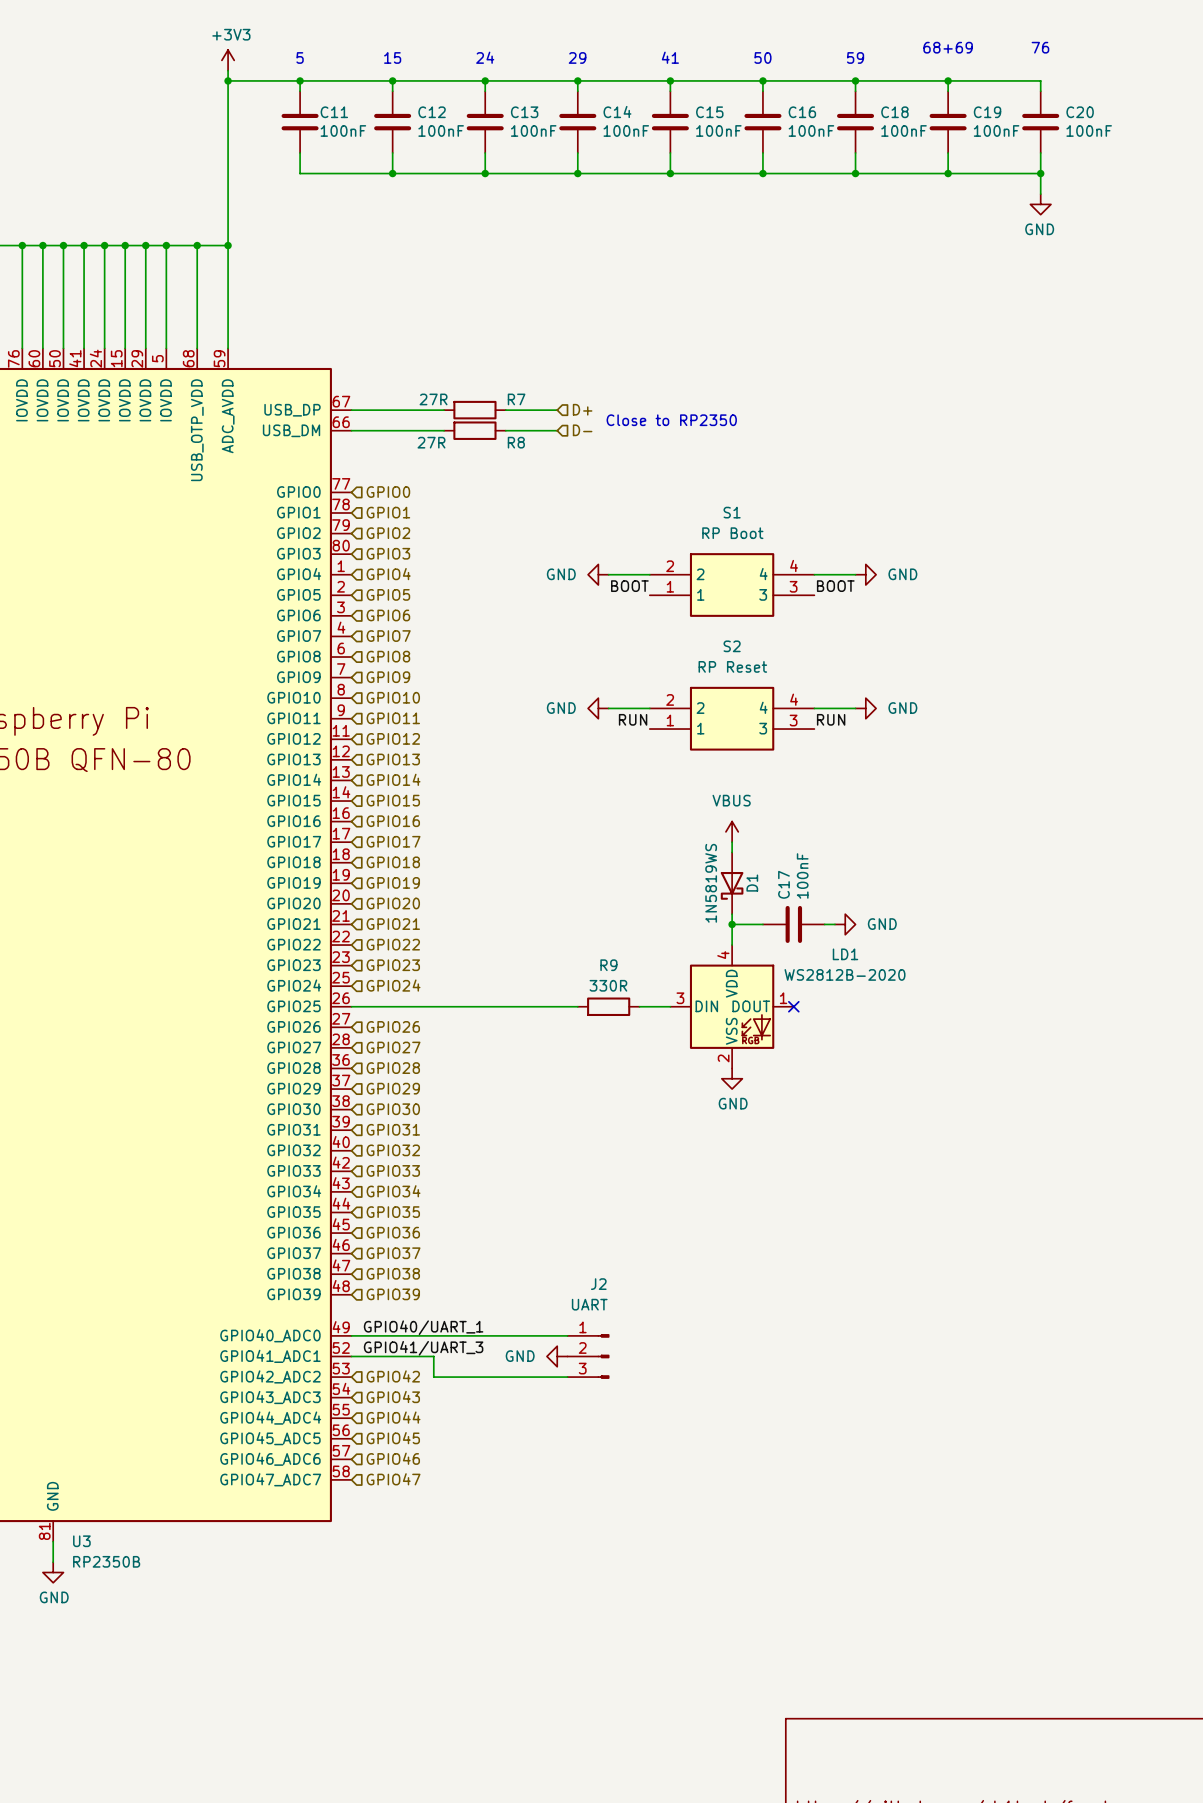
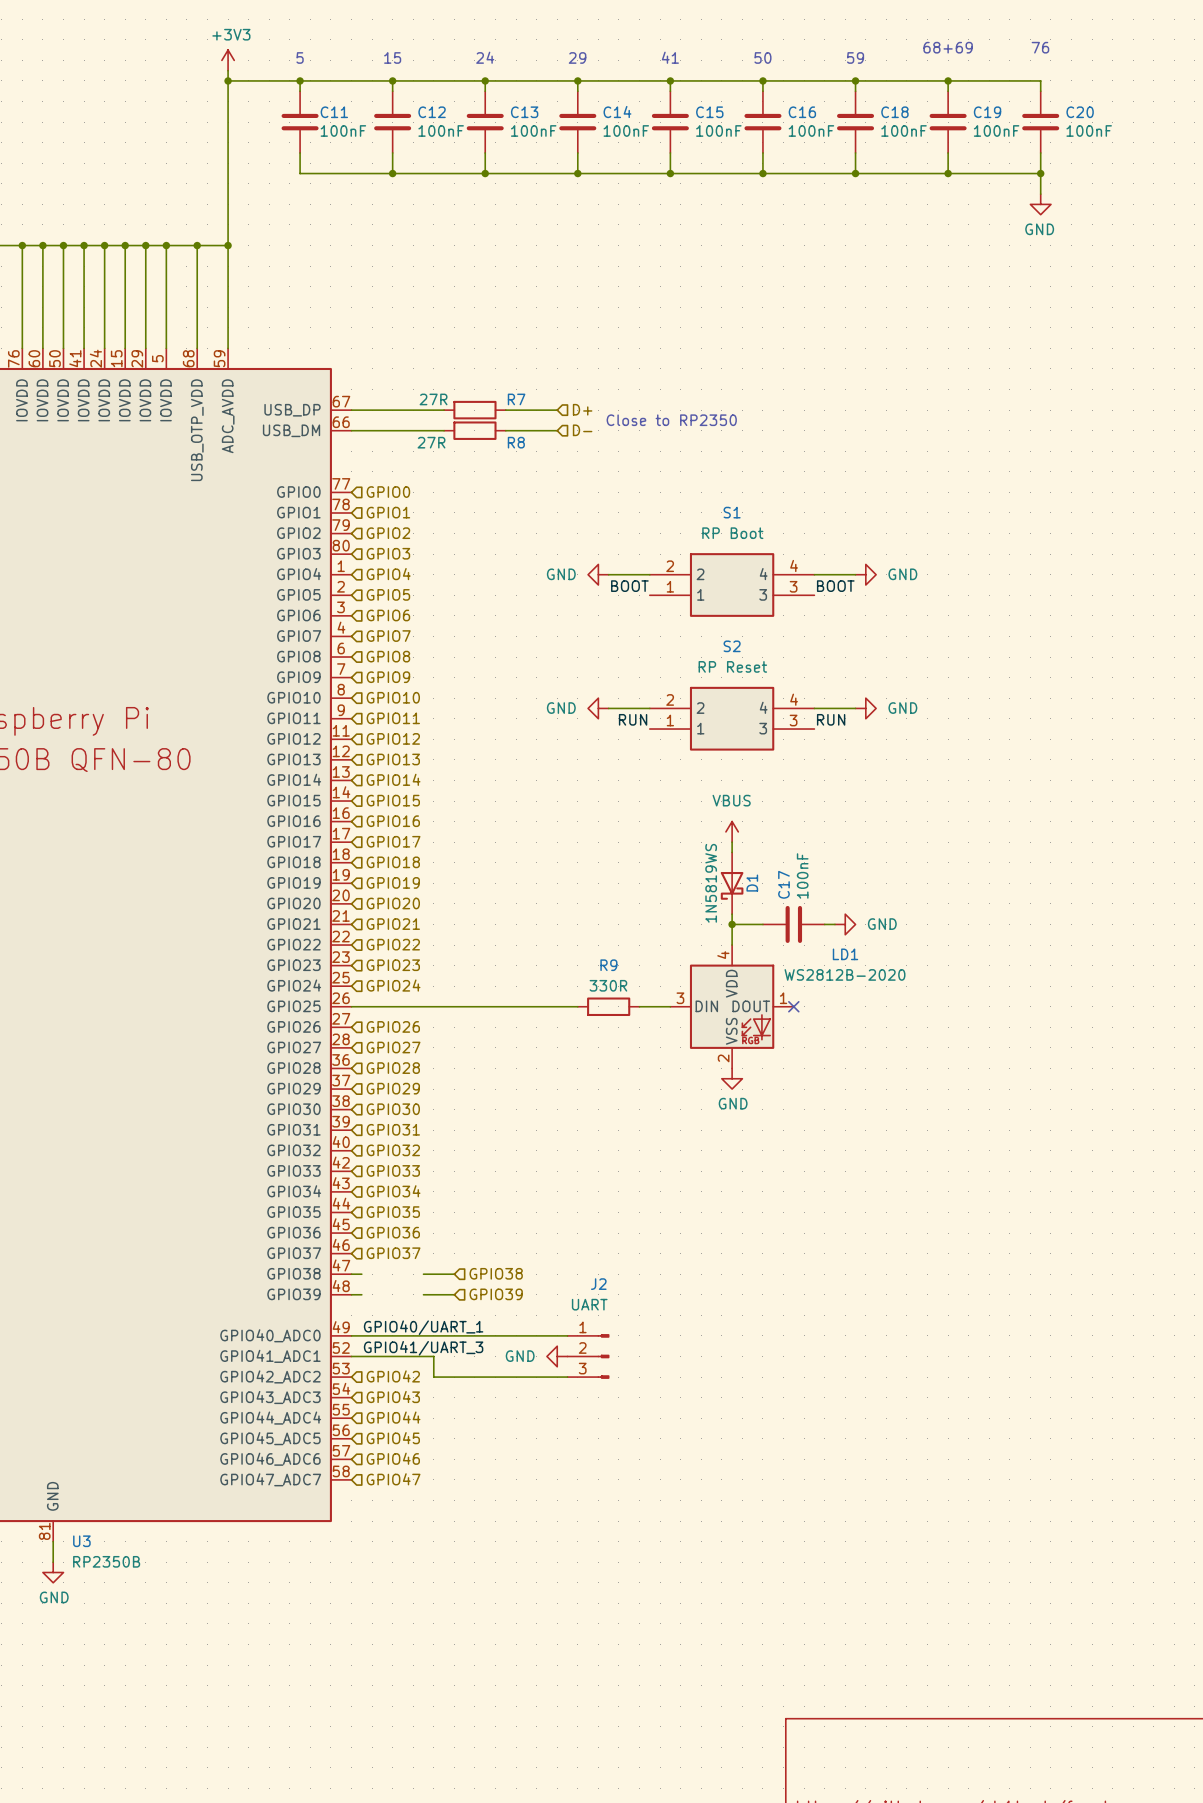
hierarchical label position: GPIO38 (393, 1273) -> GPIO38 (496, 1273)
wire: none -> (351, 1274) (361, 1274)
wire: none -> (423, 1274) (454, 1274)
wire: none -> (351, 1294) (361, 1294)
hierarchical label position: GPIO39 (393, 1294) -> GPIO39 (496, 1294)
wire: none -> (423, 1294) (454, 1294)

